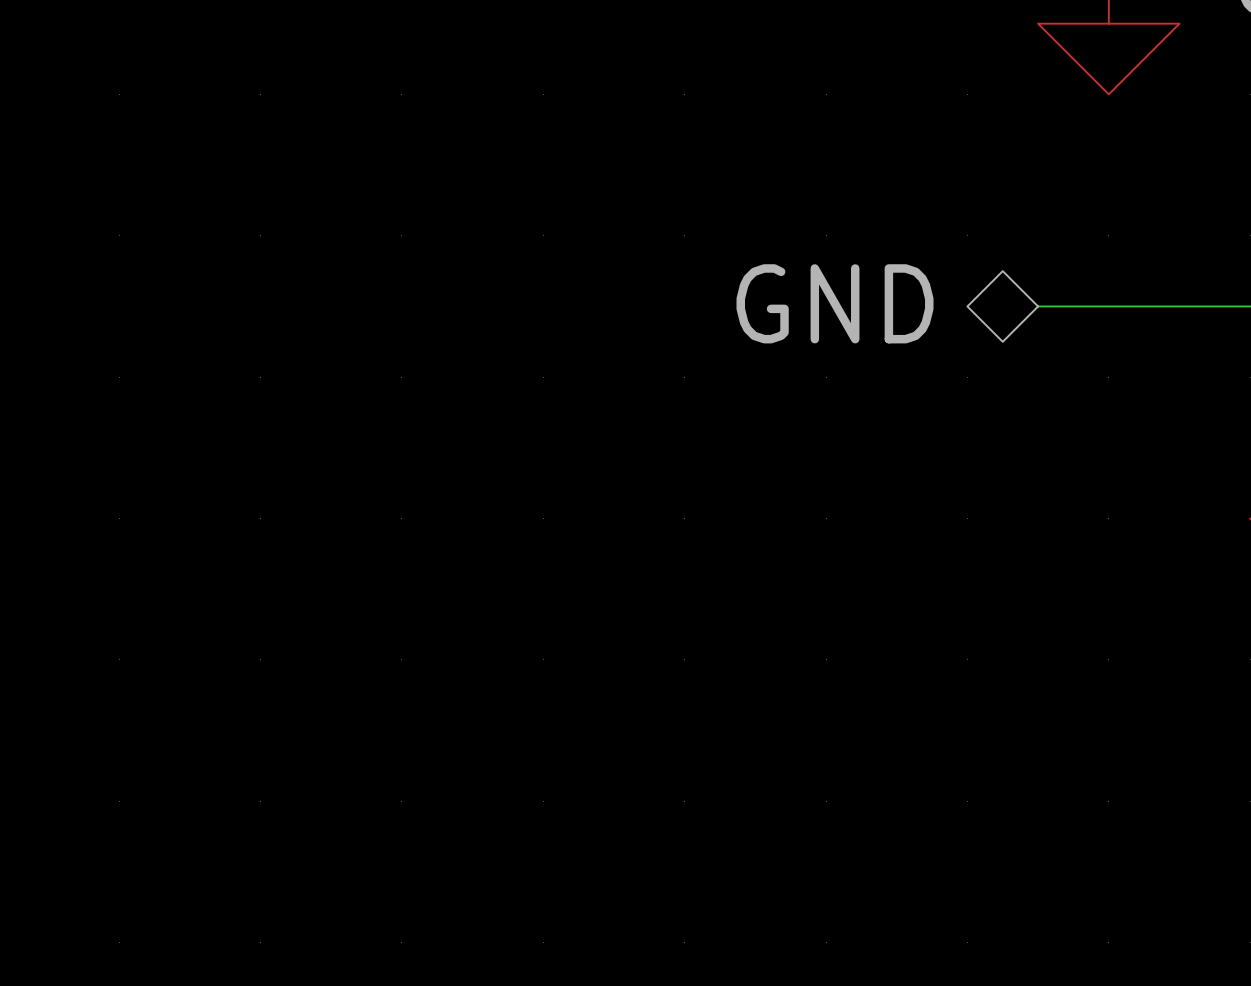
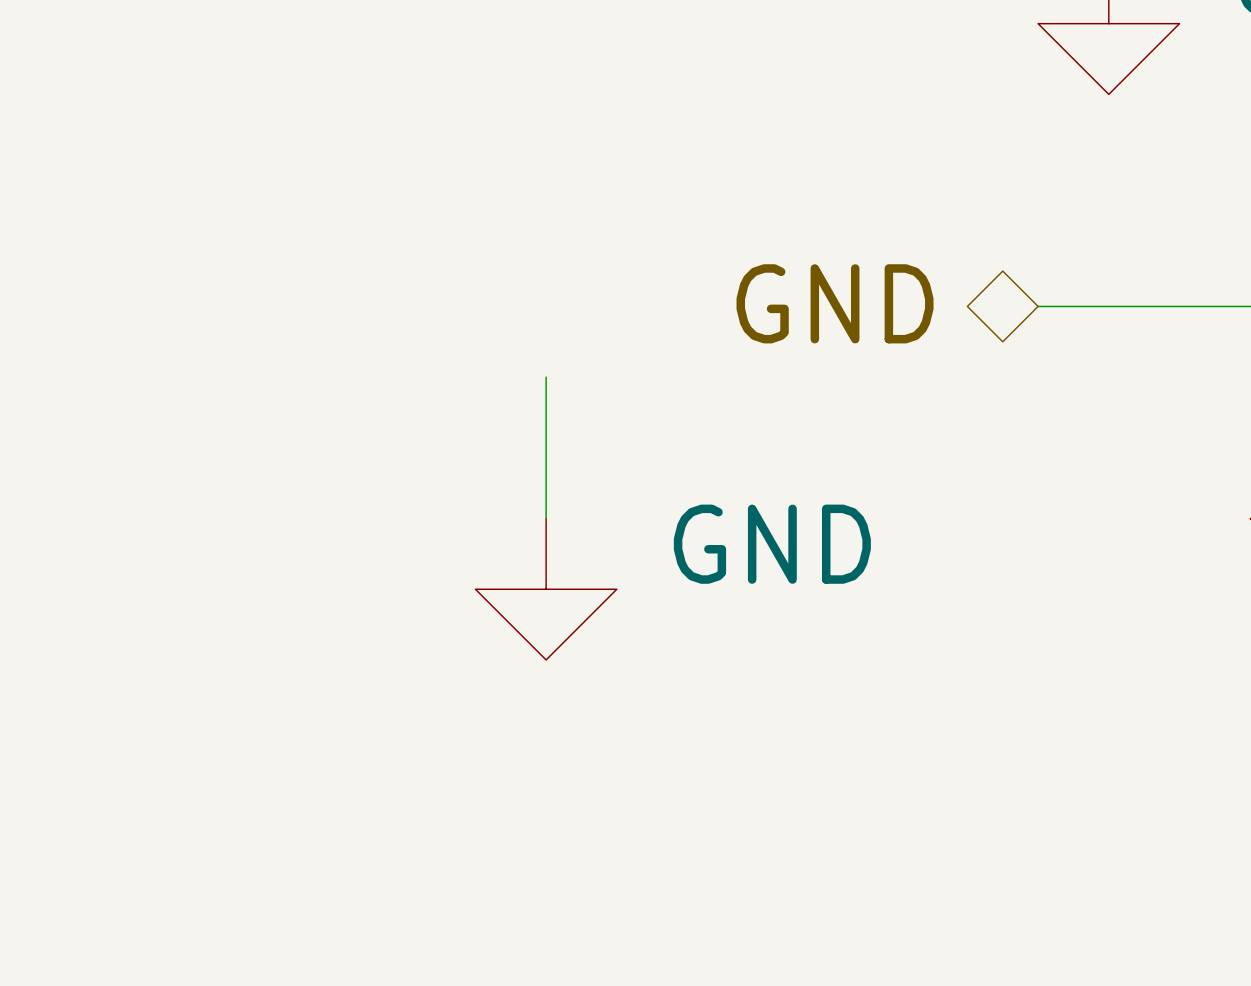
wire: none -> (546, 377) (546, 518)
power symbol: none -> GND (546, 589)

